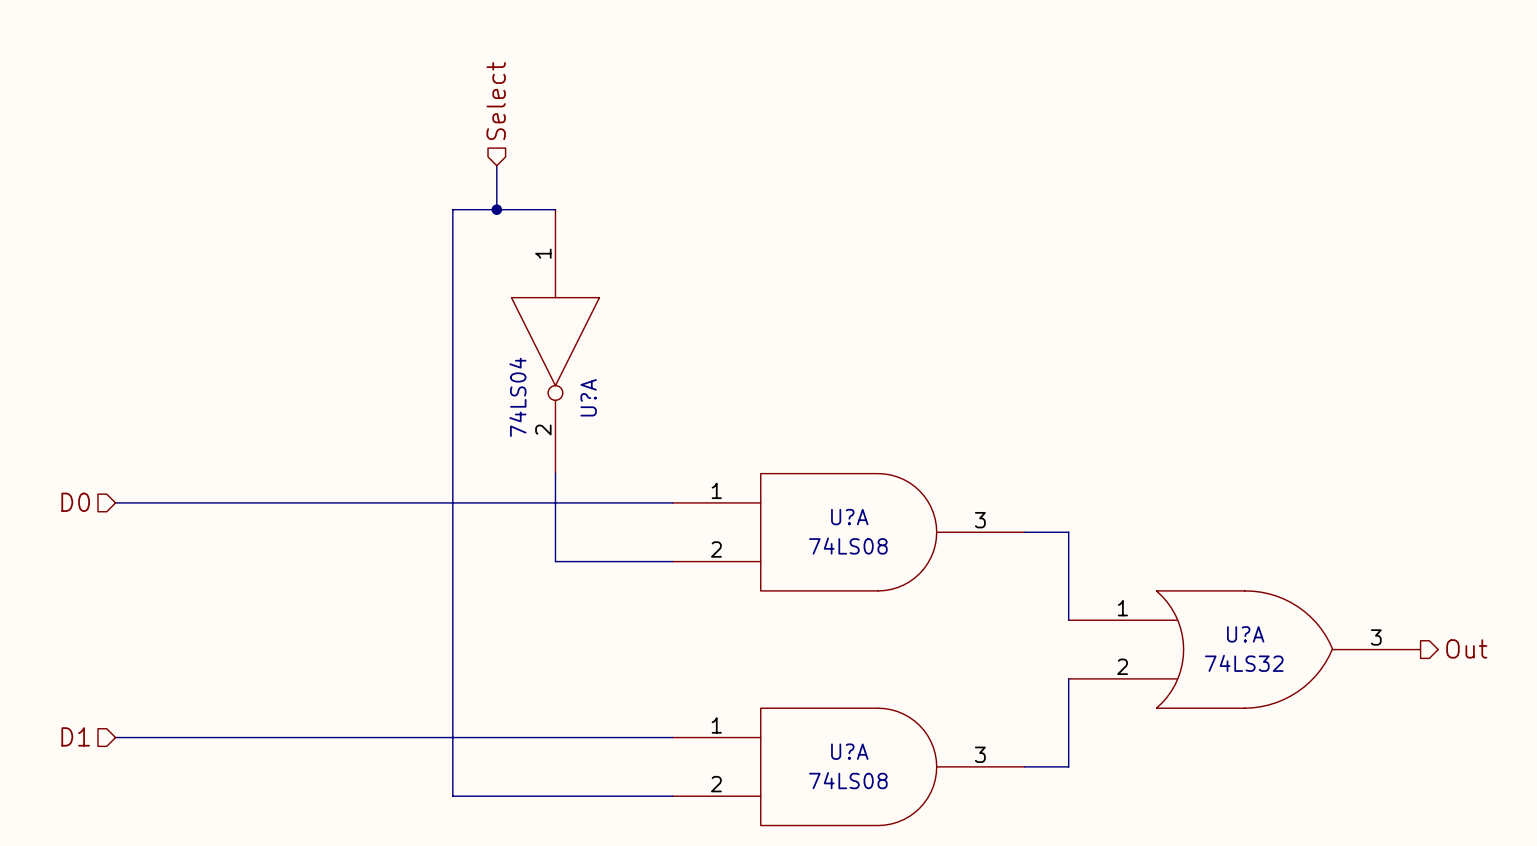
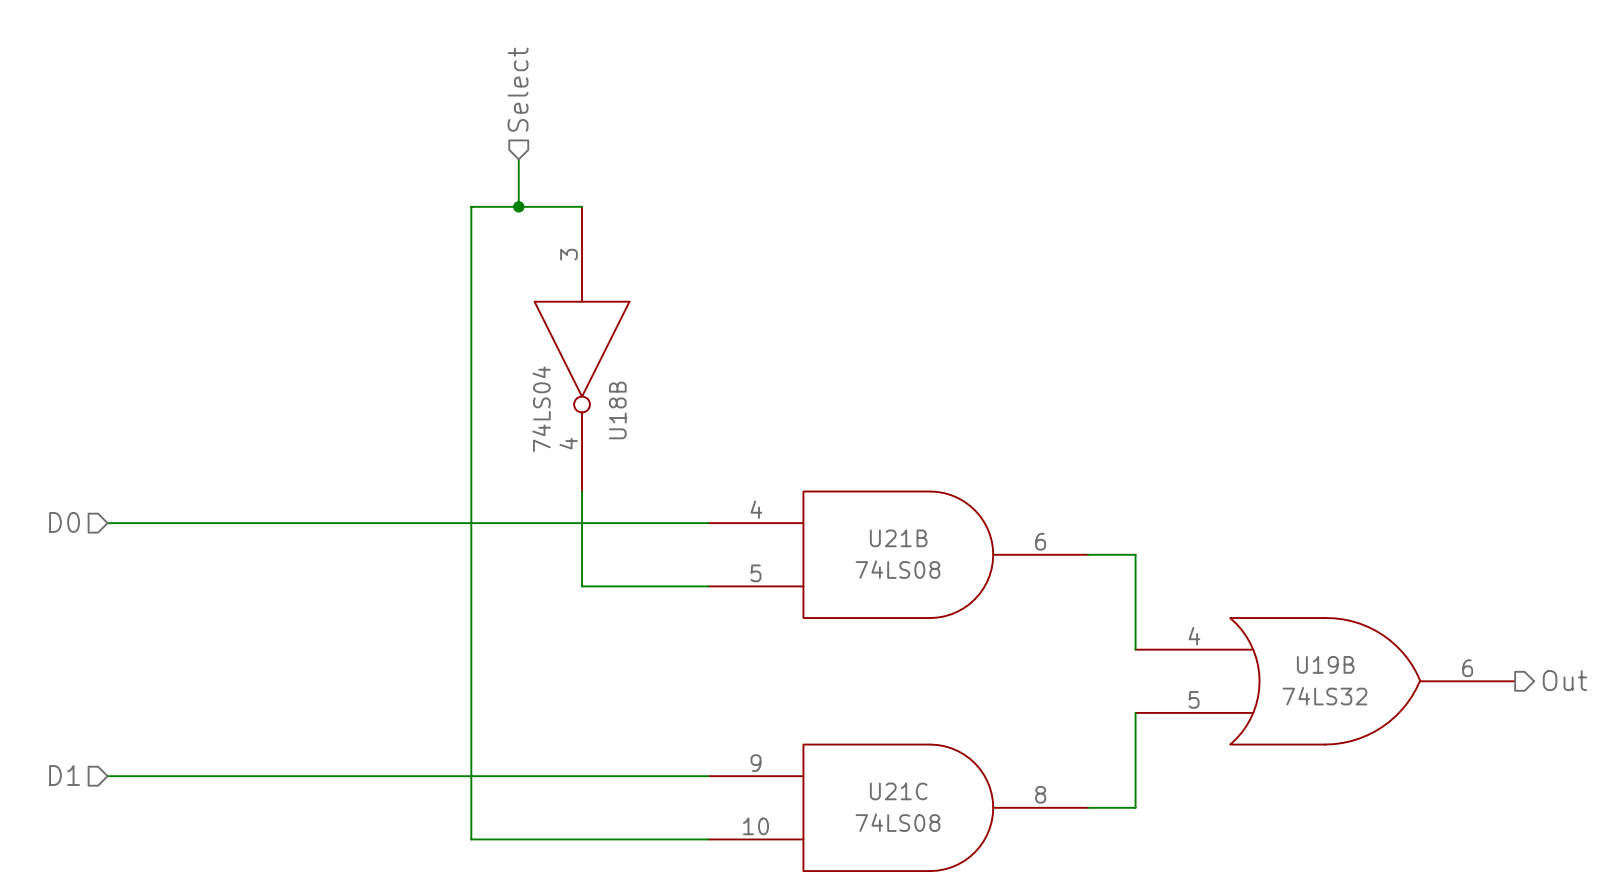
U?A pin number: 1 (543, 253) -> 3 (568, 254)
U?A name: U?A (588, 397) -> U18B (617, 410)
U?A pin number: 2 (543, 429) -> 4 (568, 443)
U?A pin number: 1 (716, 490) -> 4 (756, 509)
U?A name: U?A (849, 517) -> U21B (898, 538)
U?A pin number: 3 (980, 520) -> 6 (1040, 541)
U?A pin number: 2 (716, 549) -> 5 (756, 573)
U?A pin number: 1 (1122, 608) -> 4 (1194, 636)
U?A name: U?A (1245, 634) -> U19B (1325, 664)
U?A pin number: 3 (1376, 637) -> 6 (1467, 668)
U?A pin number: 2 (1122, 666) -> 5 (1194, 699)
U?A pin number: 1 (716, 725) -> 9 (756, 763)
U?A name: U?A (849, 751) -> U21C (898, 791)
U?A pin number: 3 (980, 754) -> 8 (1040, 794)
U?A pin number: 2 (716, 784) -> 10 (756, 826)

